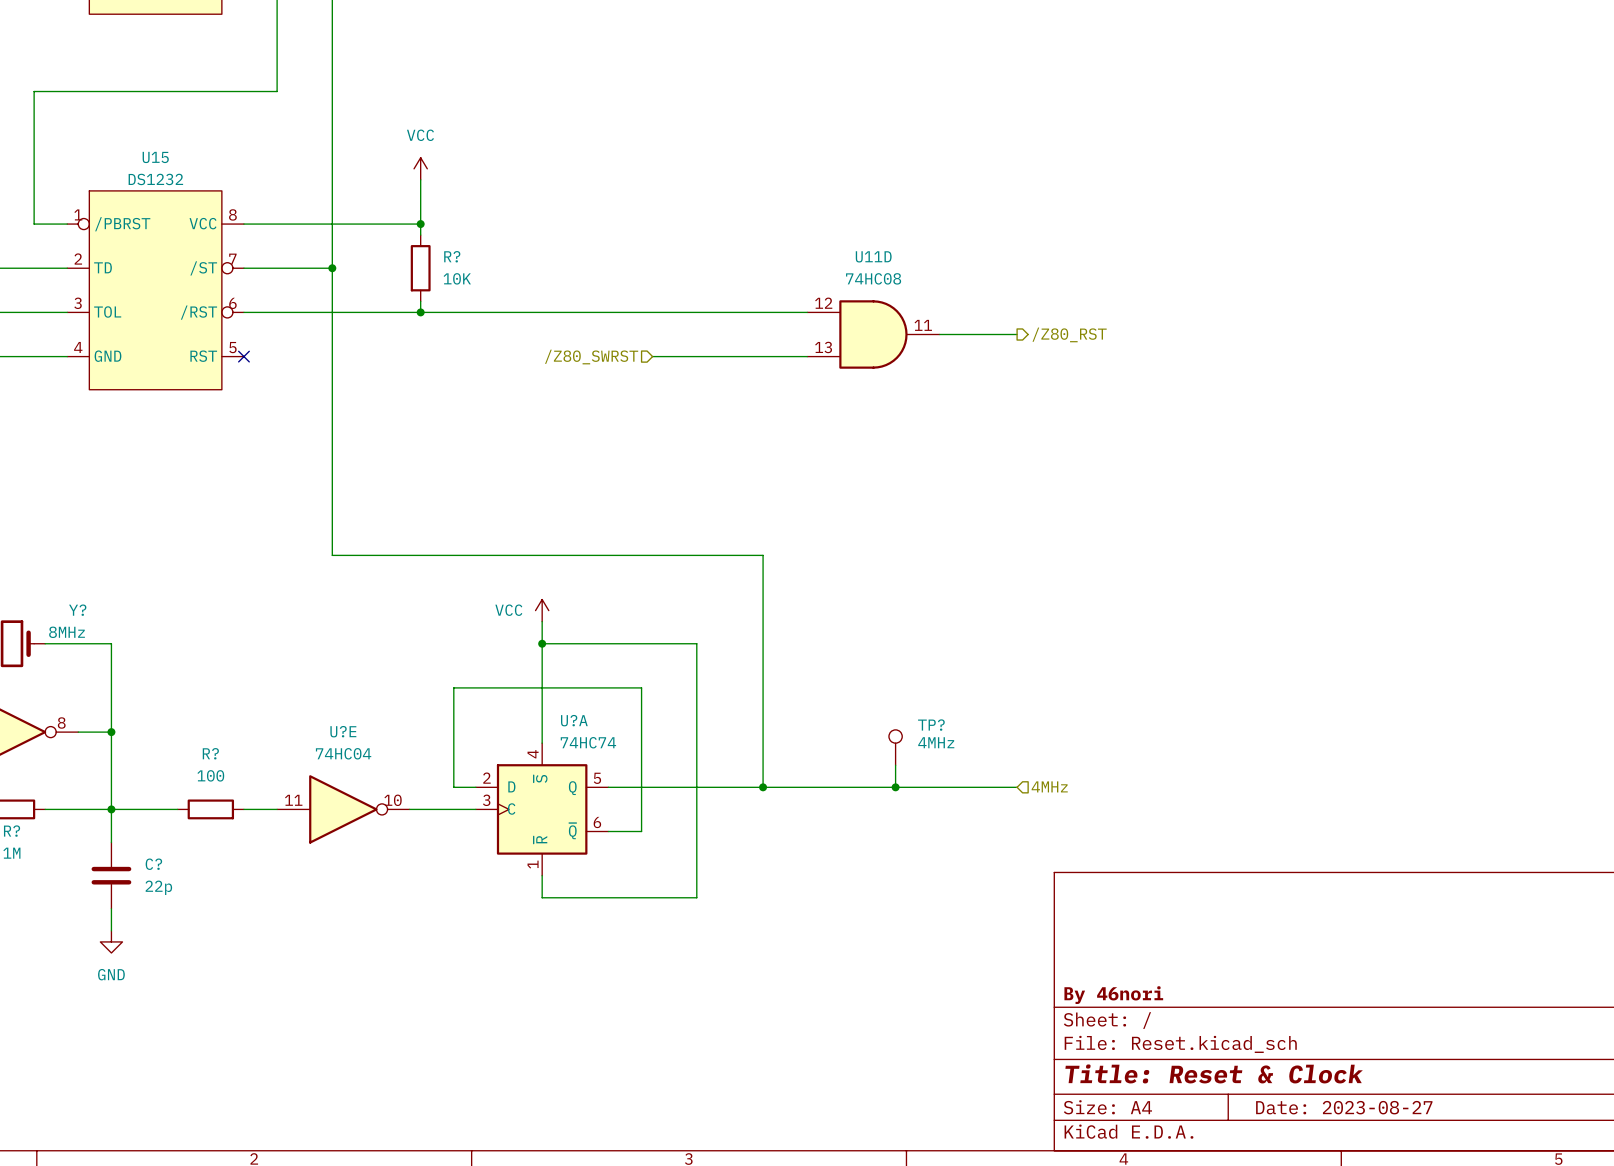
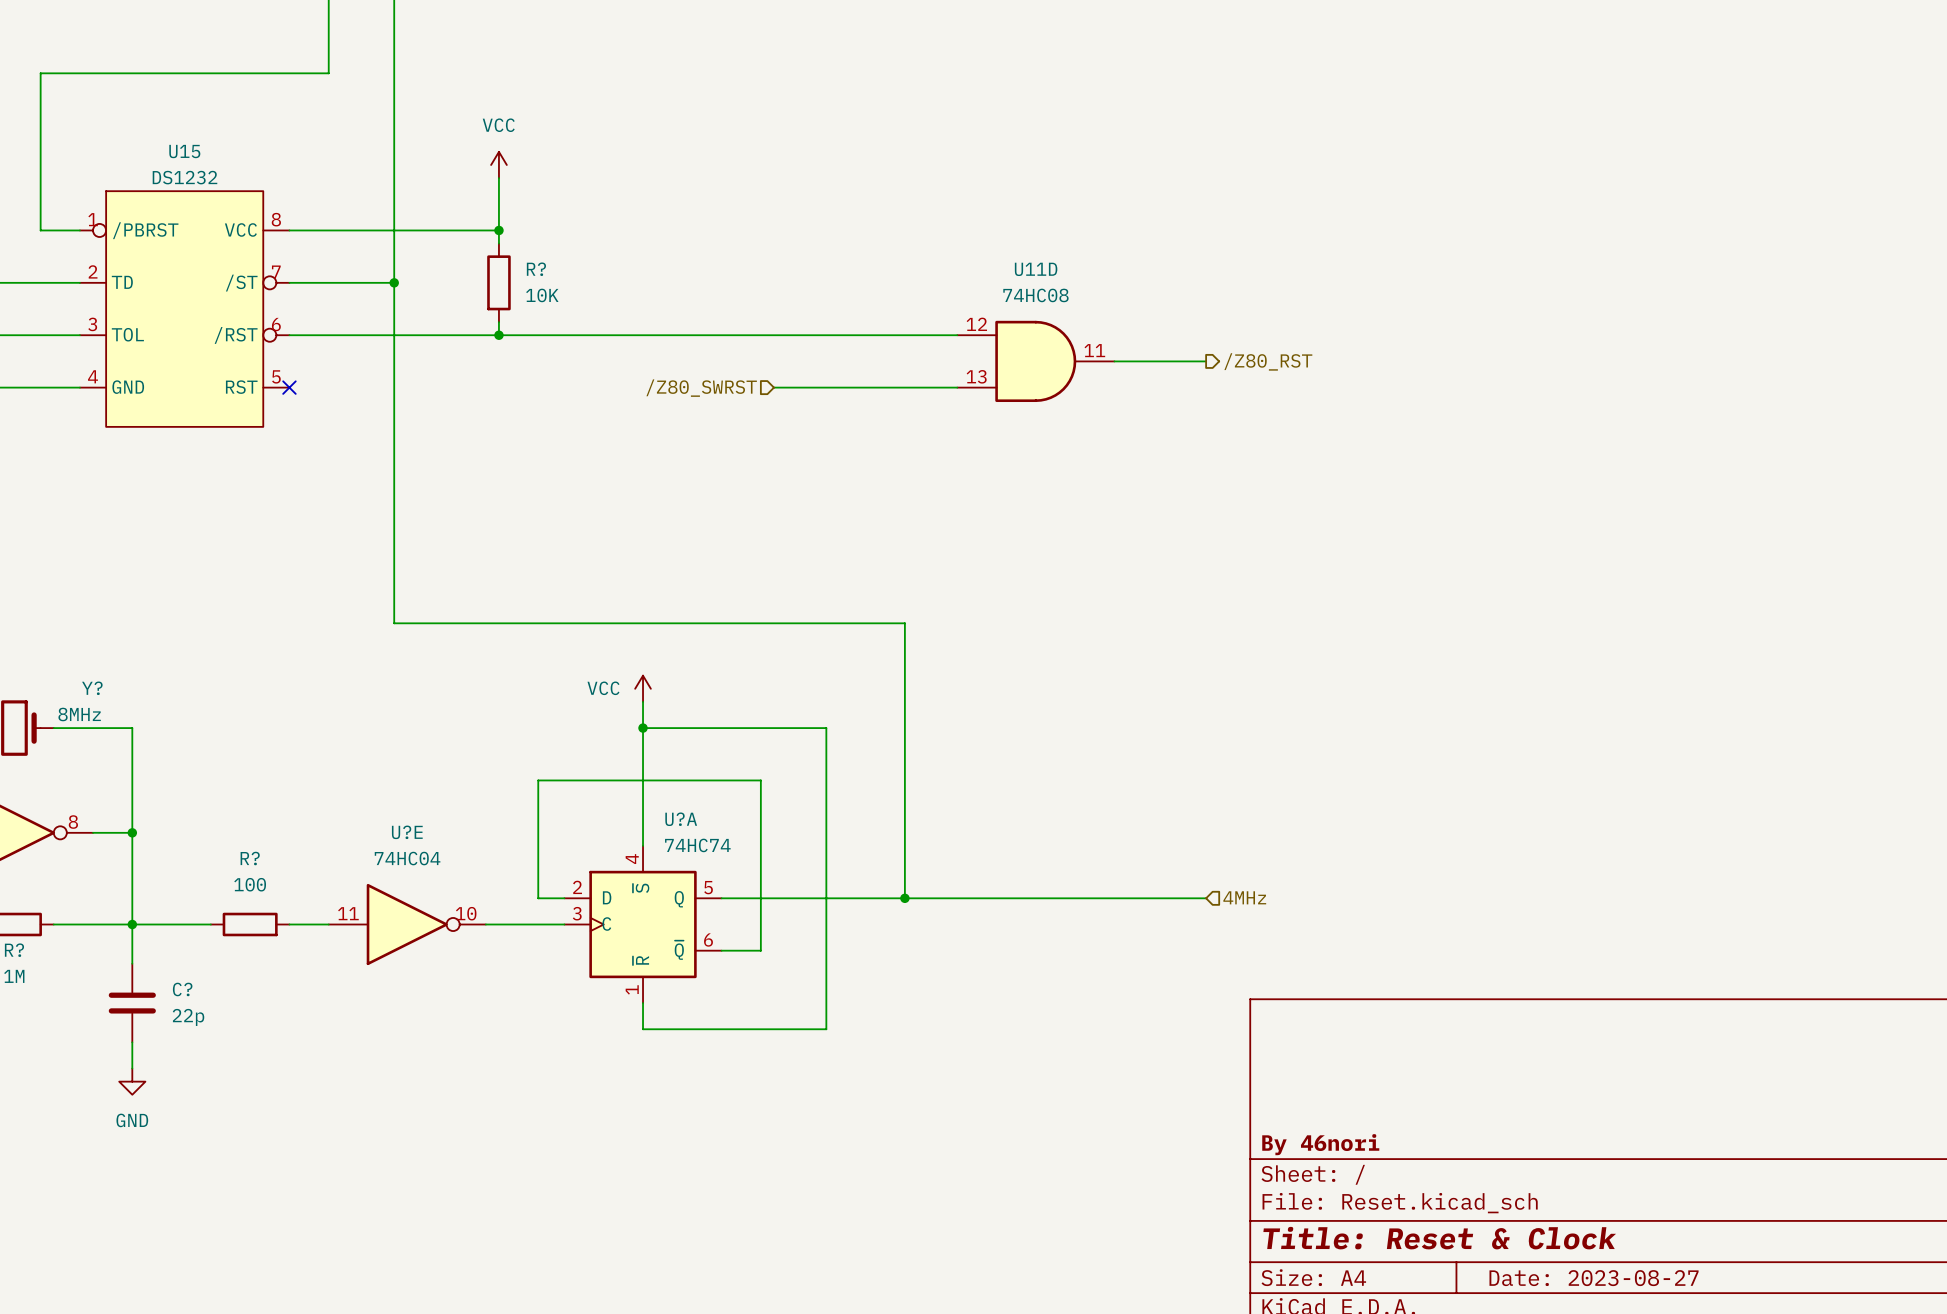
TP?: 4MHz (895, 747) -> none
wire: (895, 765) (895, 787) -> none
junction: (895, 787) -> none

